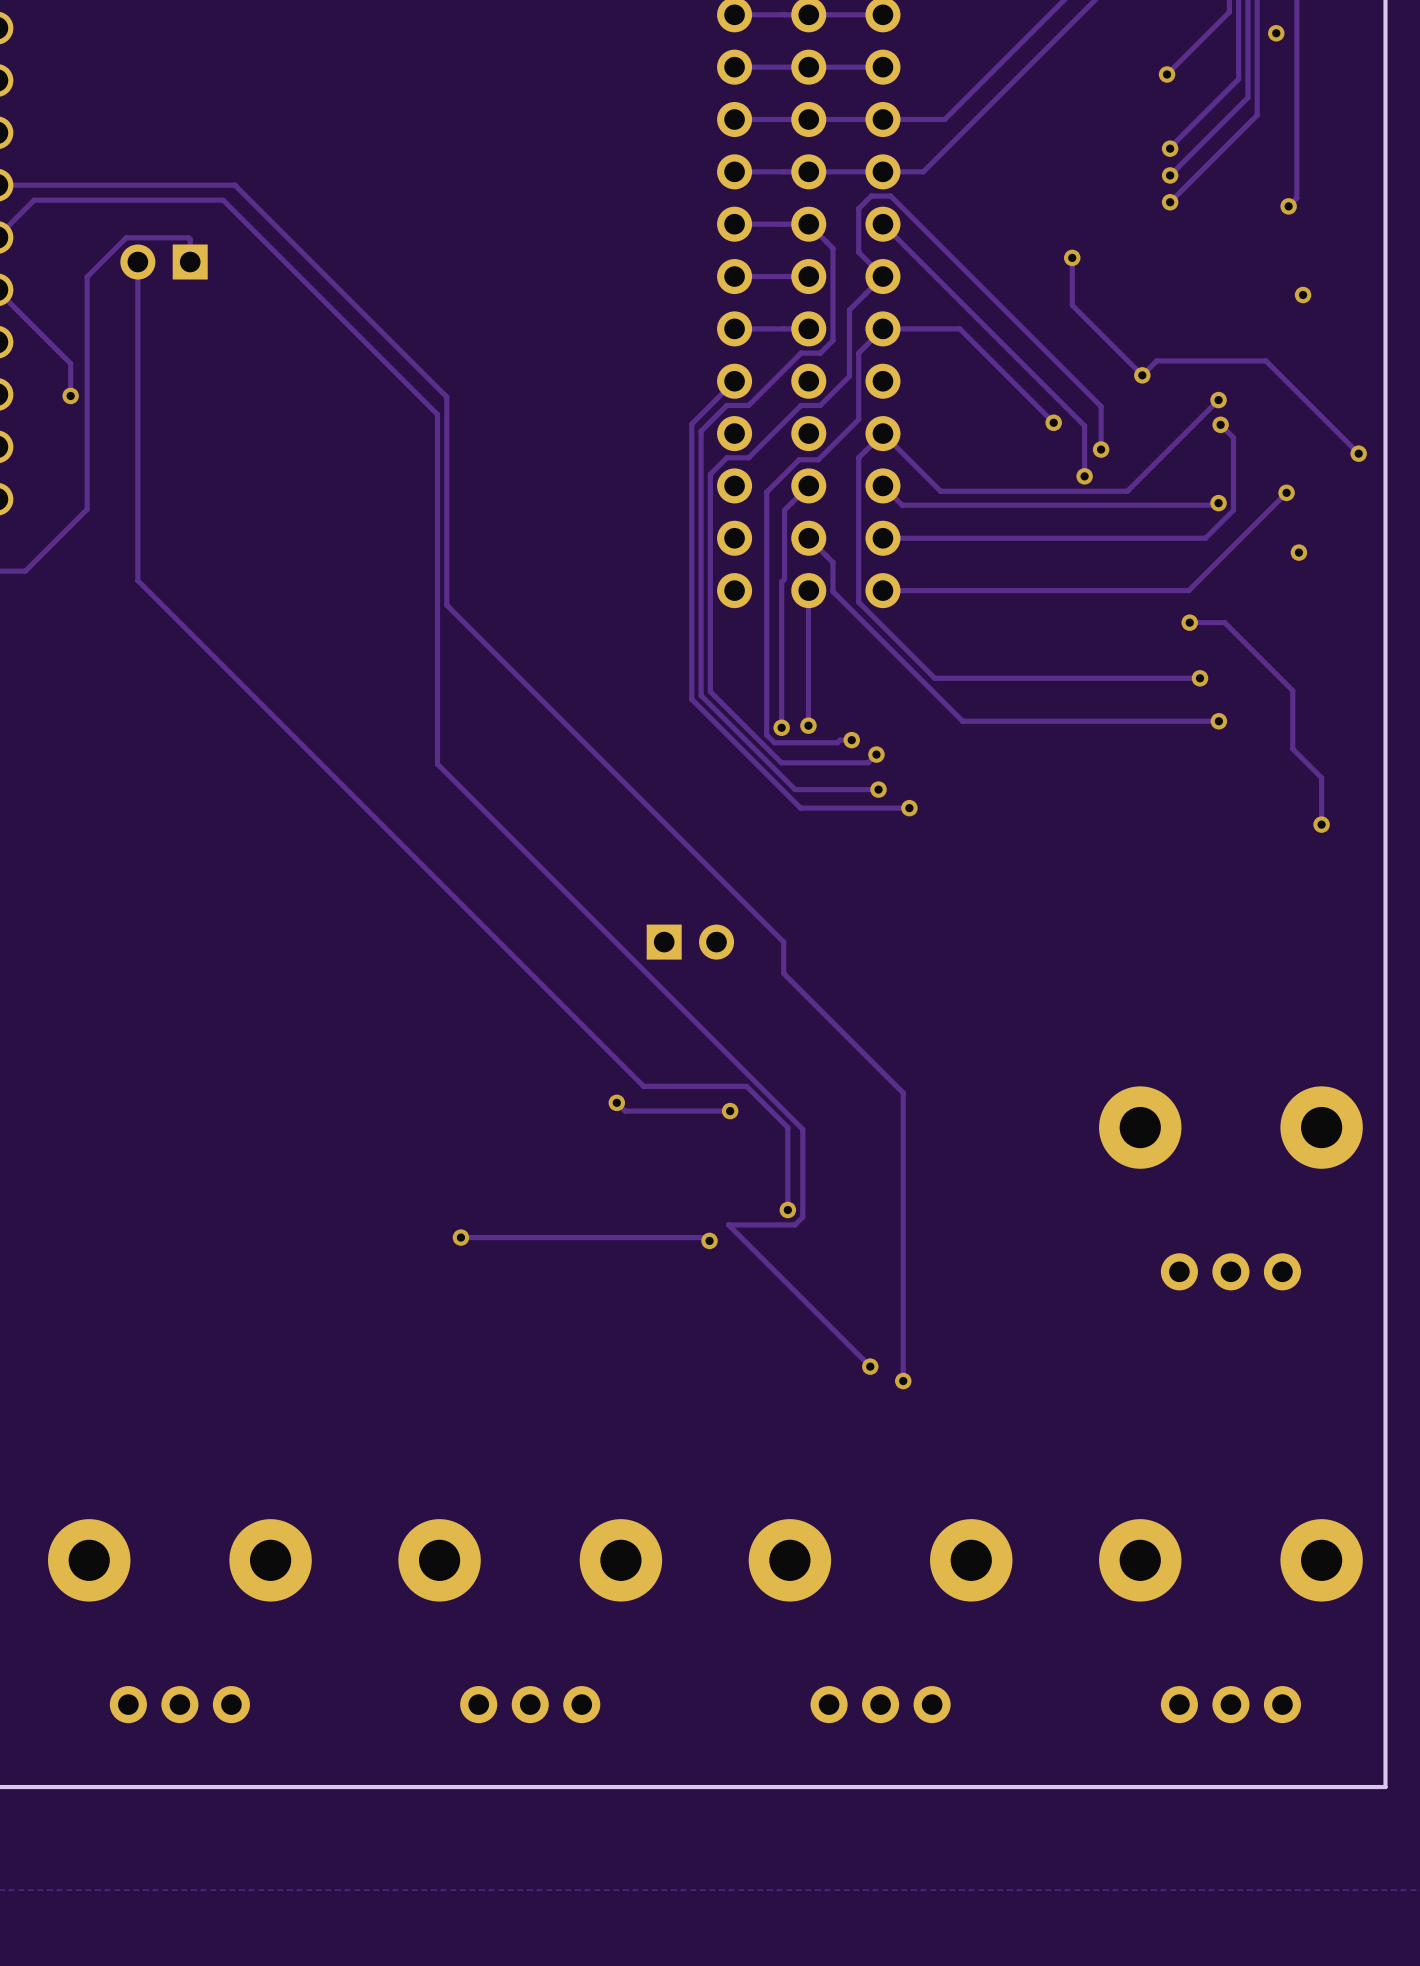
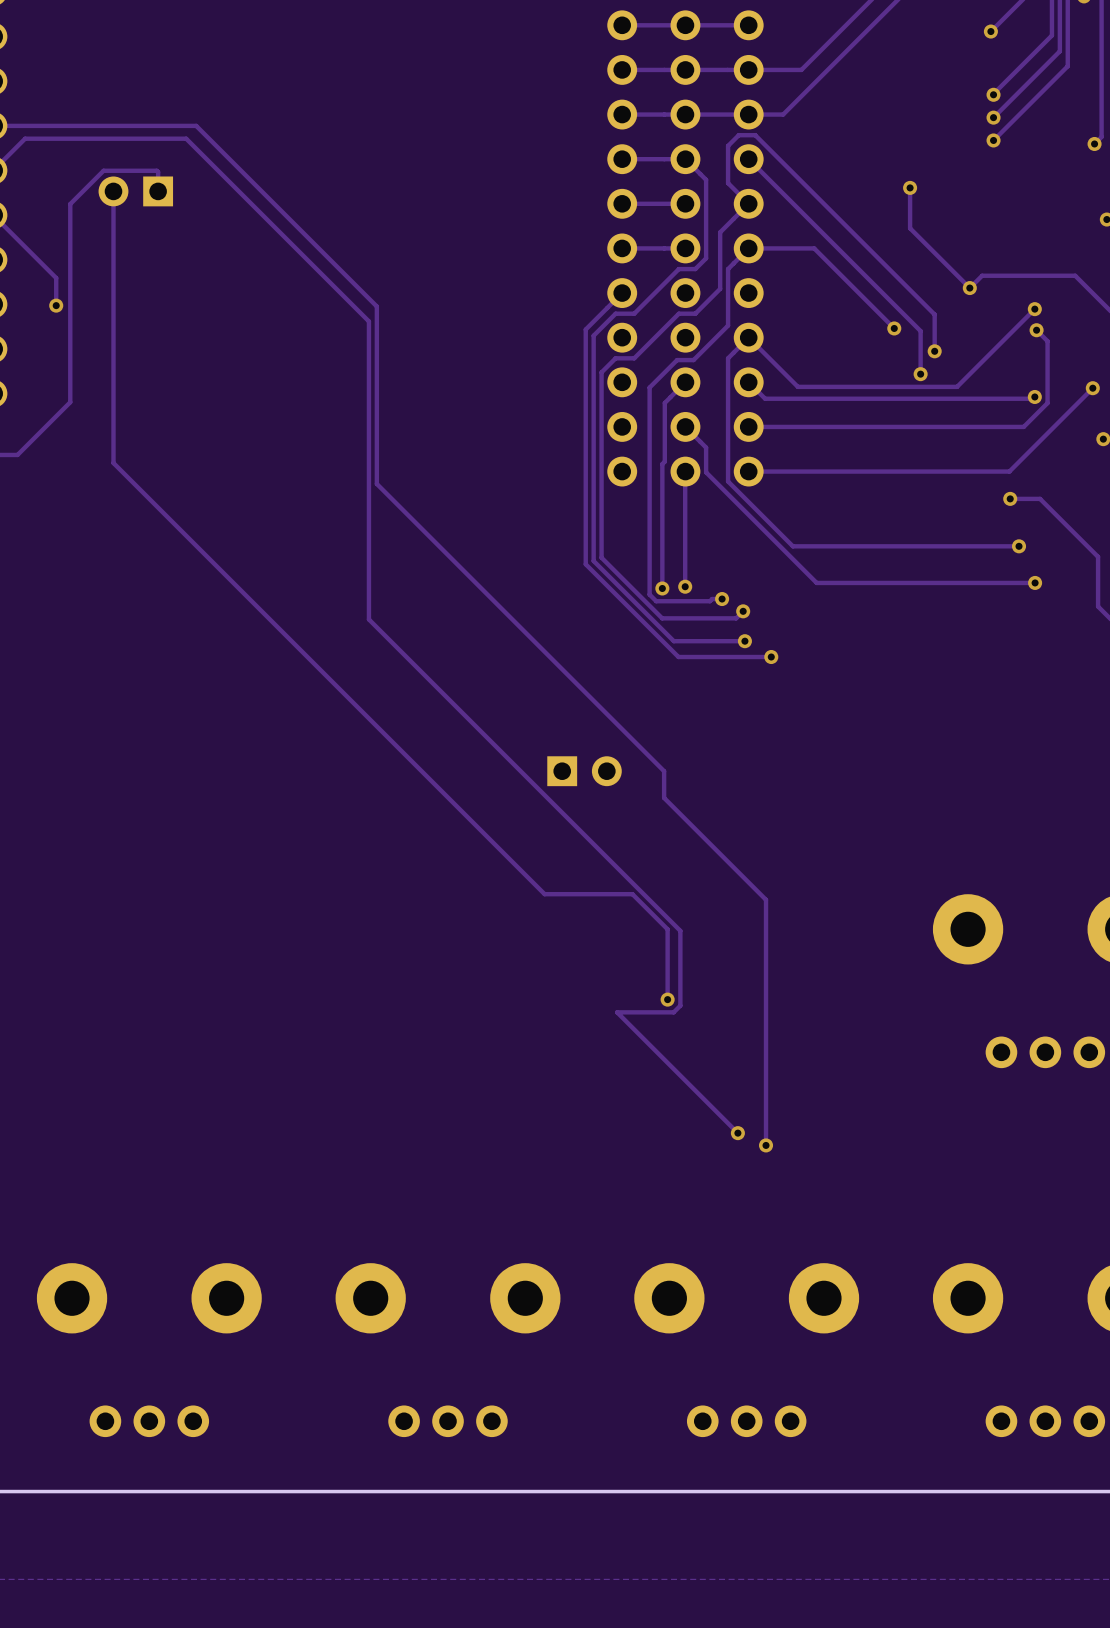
track: (616, 1102) (625, 1111) (730, 1111) -> none
via: (616, 1102) -> none
via: (730, 1111) -> none
track: (460, 1237) (706, 1237) (709, 1240) -> none
via: (460, 1237) -> none
via: (709, 1240) -> none

